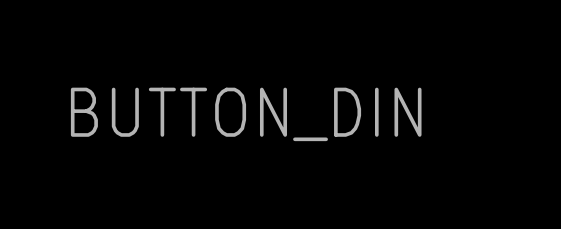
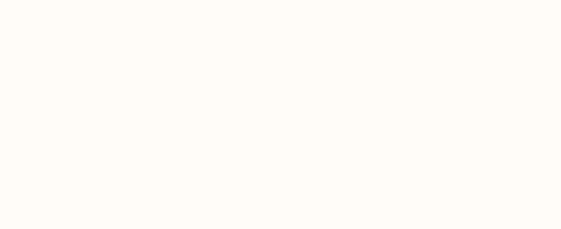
label: BUTTON_DIN (246, 114) -> none

